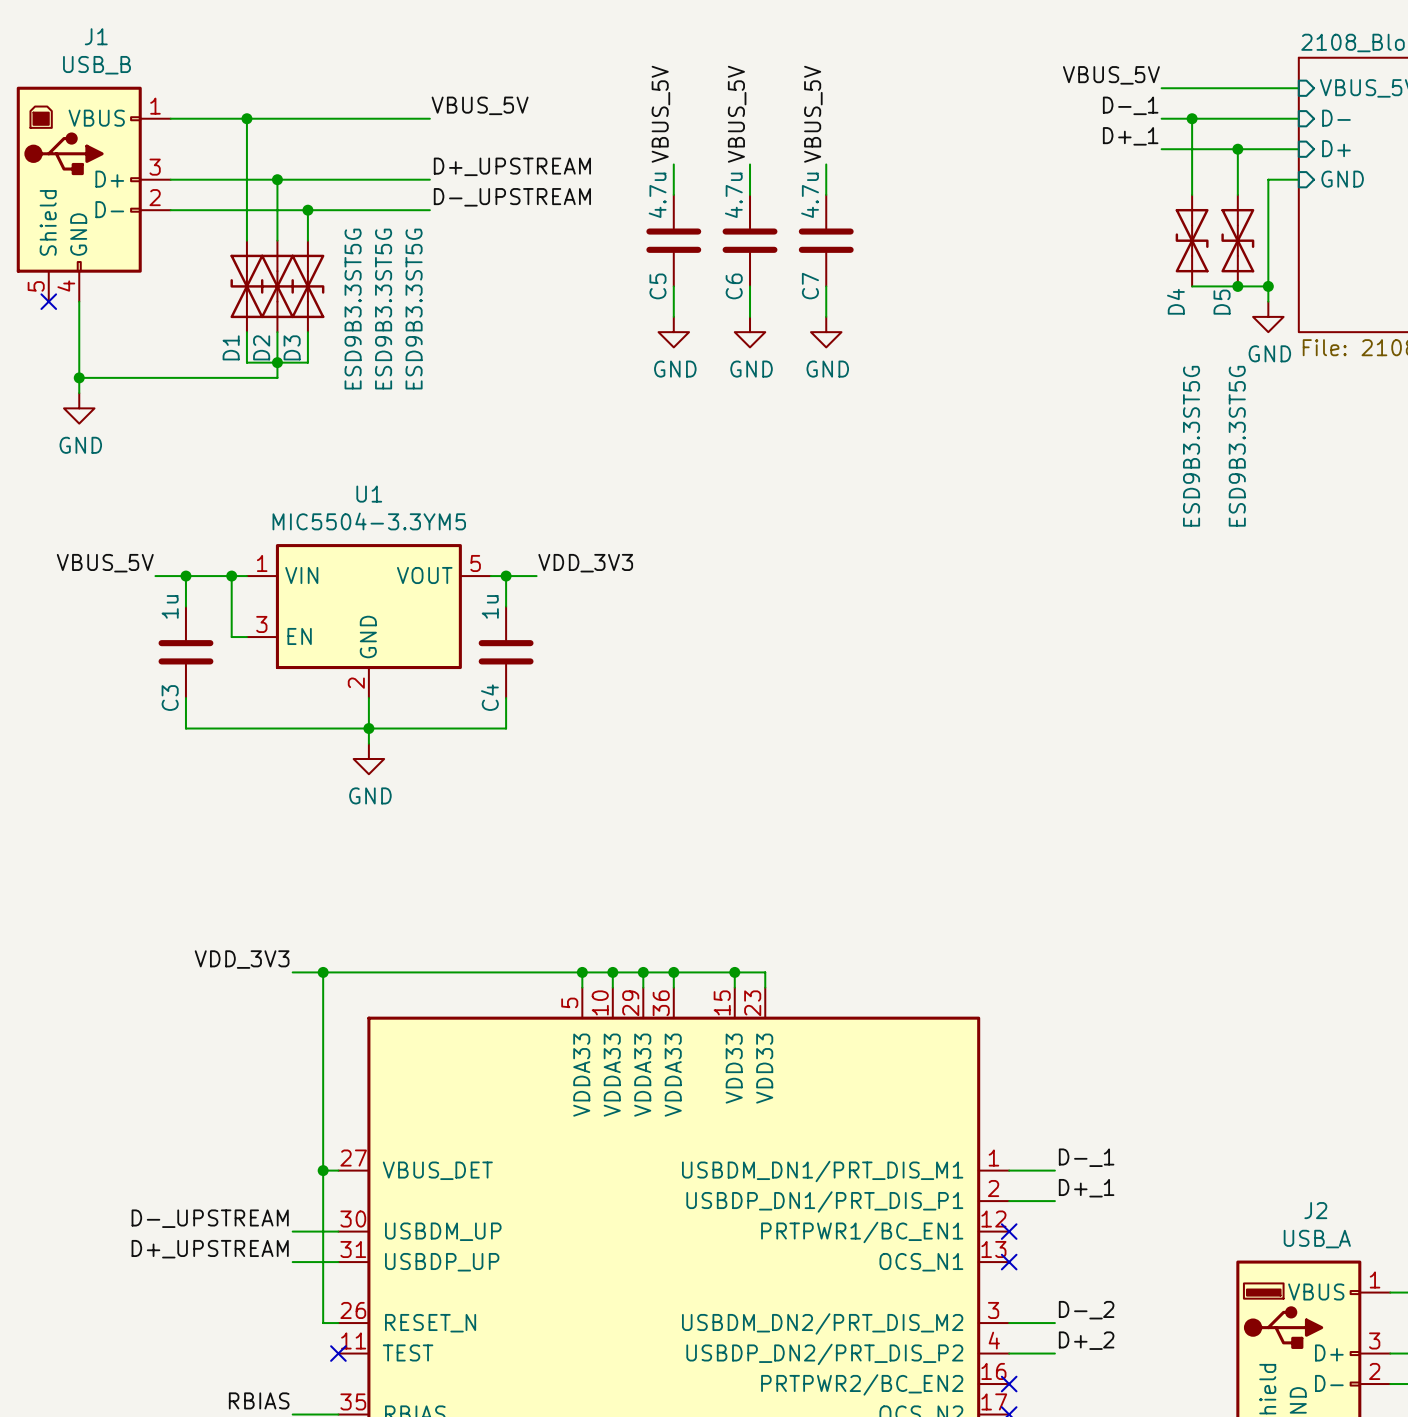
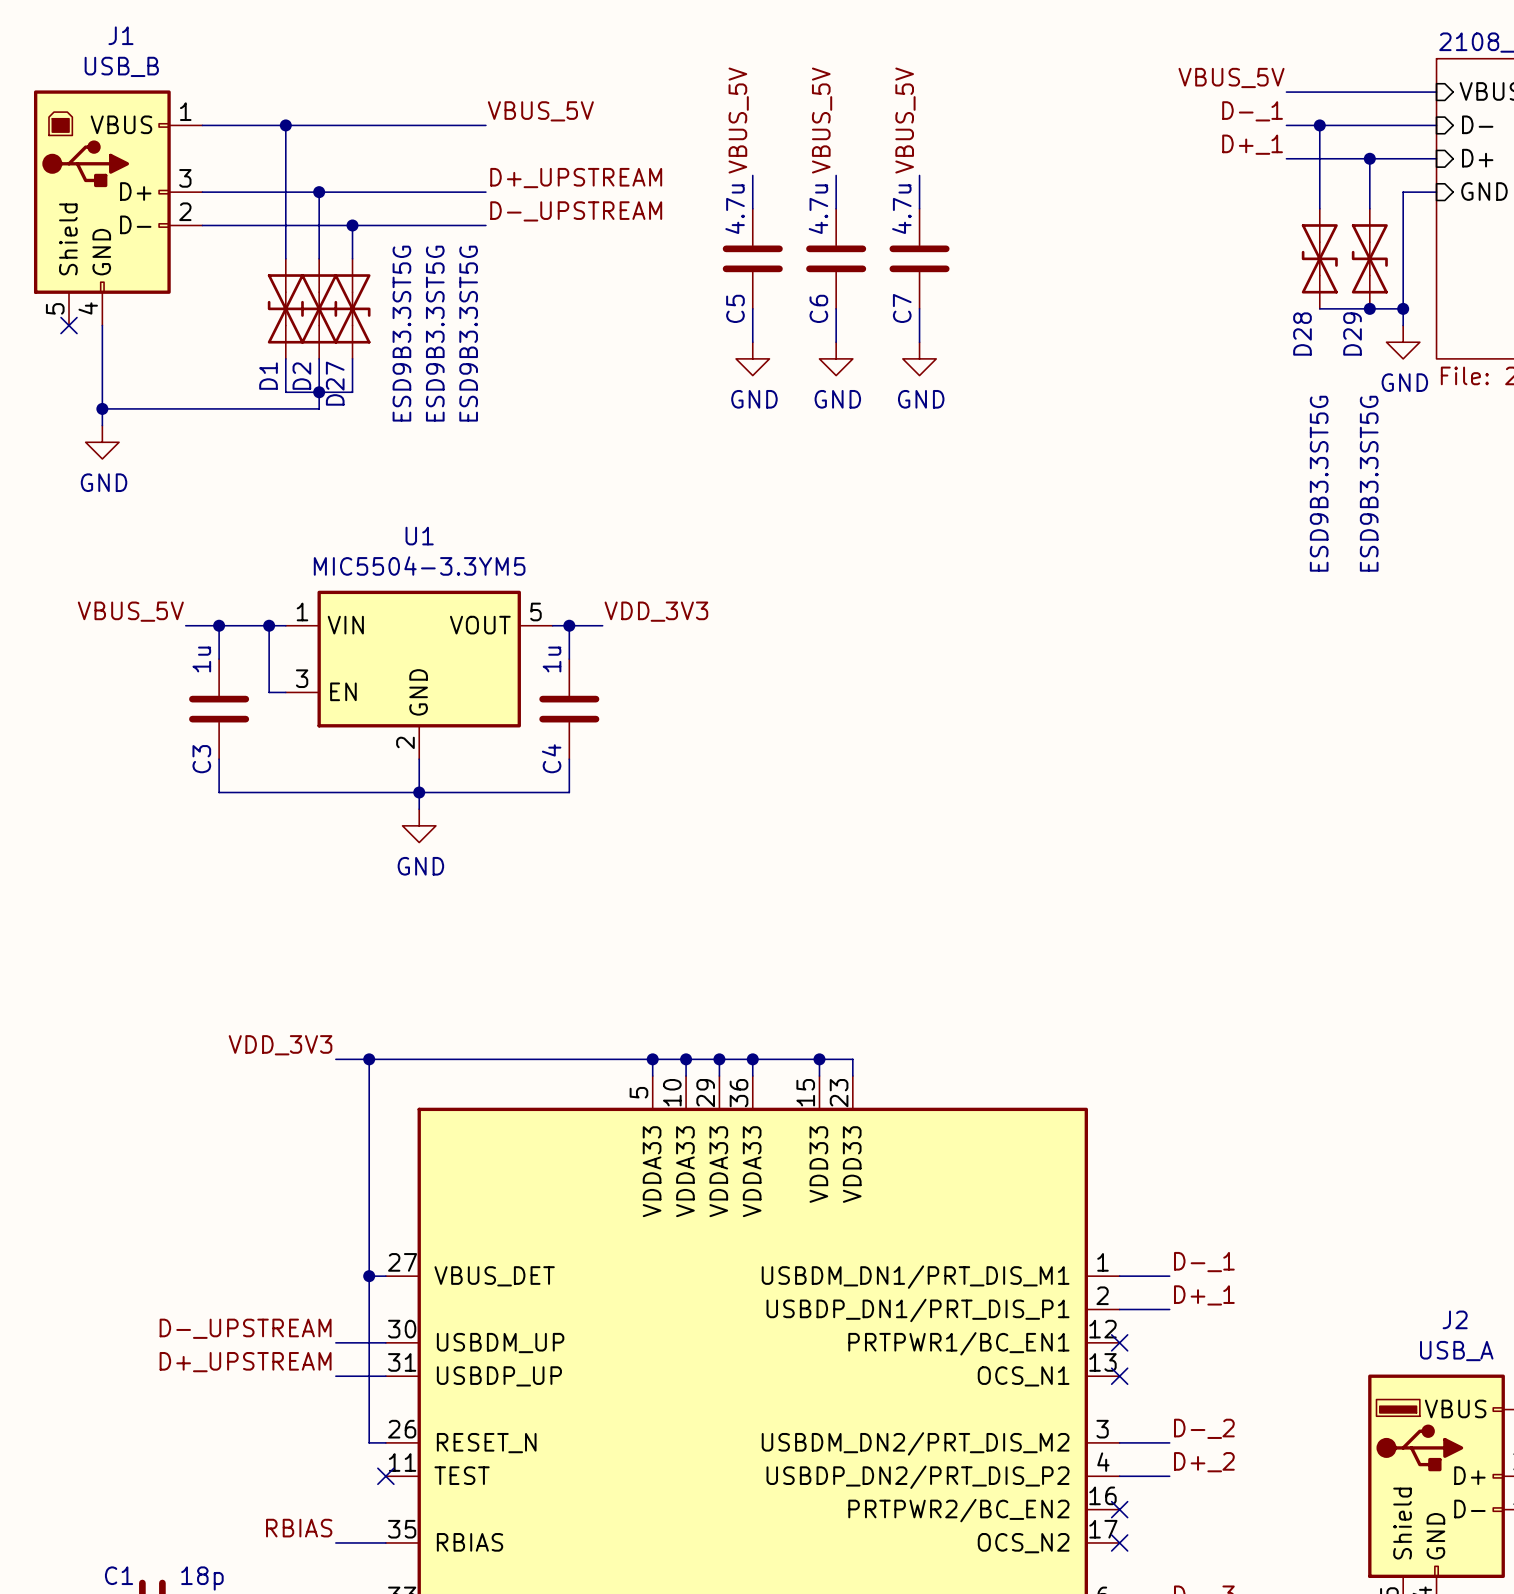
D4 name: D4 (1175, 301) -> D28 (1302, 334)
D5 name: D5 (1222, 302) -> D29 (1352, 334)
D3 name: D3 (292, 347) -> D27 (335, 383)

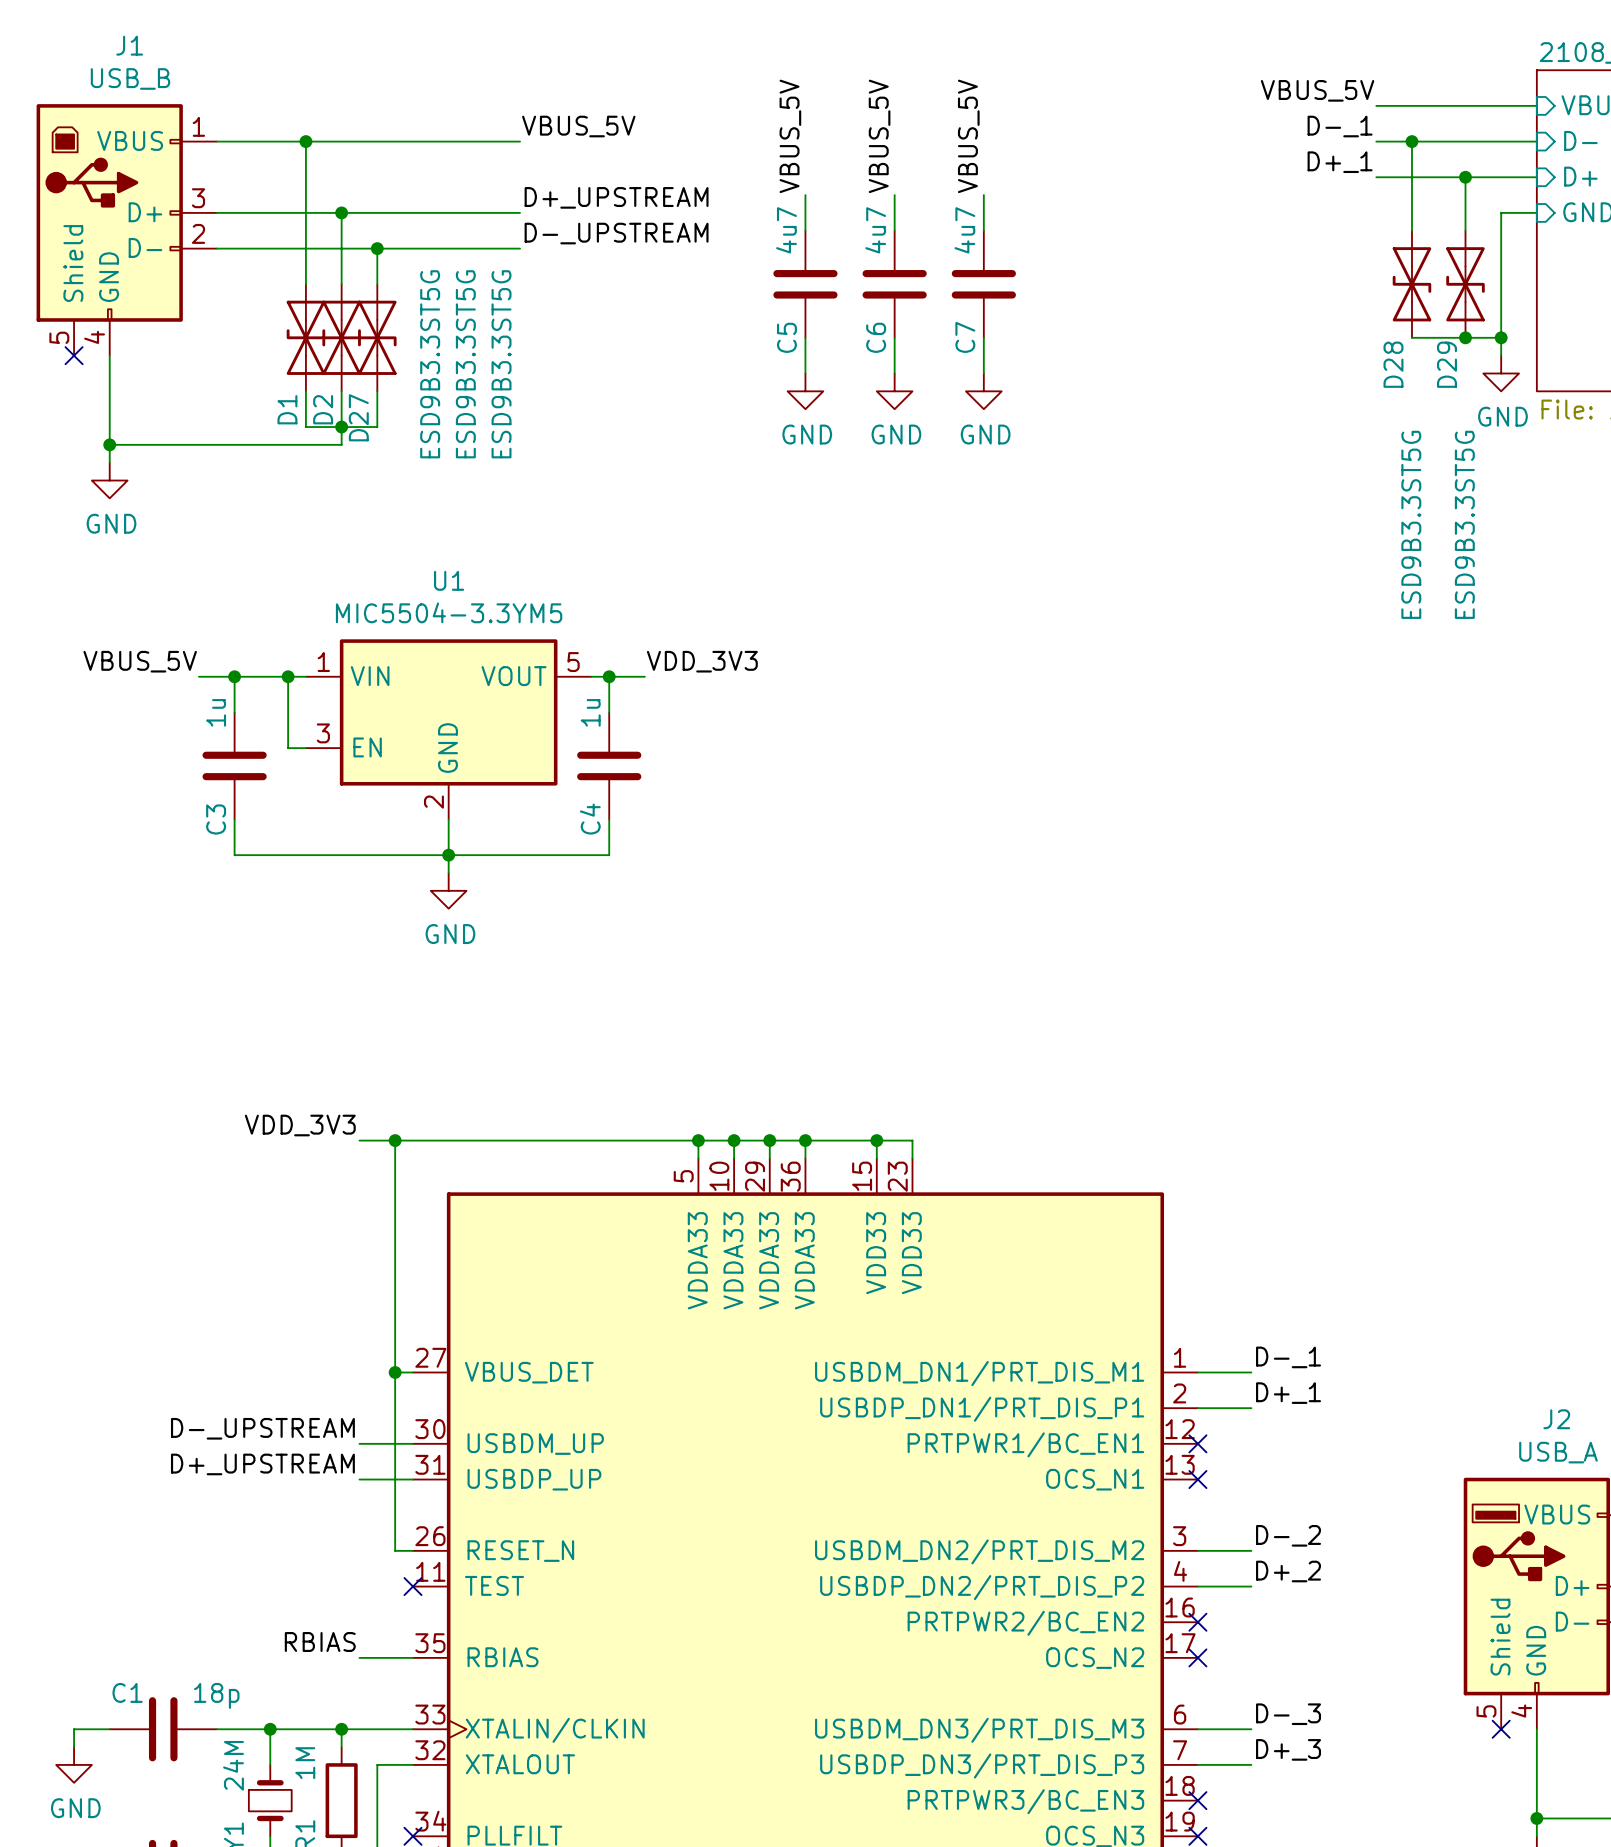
C5 value: 4.7u (735, 209) -> 4u7 (786, 230)
C6 value: 4.7u (818, 209) -> 4u7 (875, 230)
C7 value: 4.7u (901, 209) -> 4u7 (964, 230)

